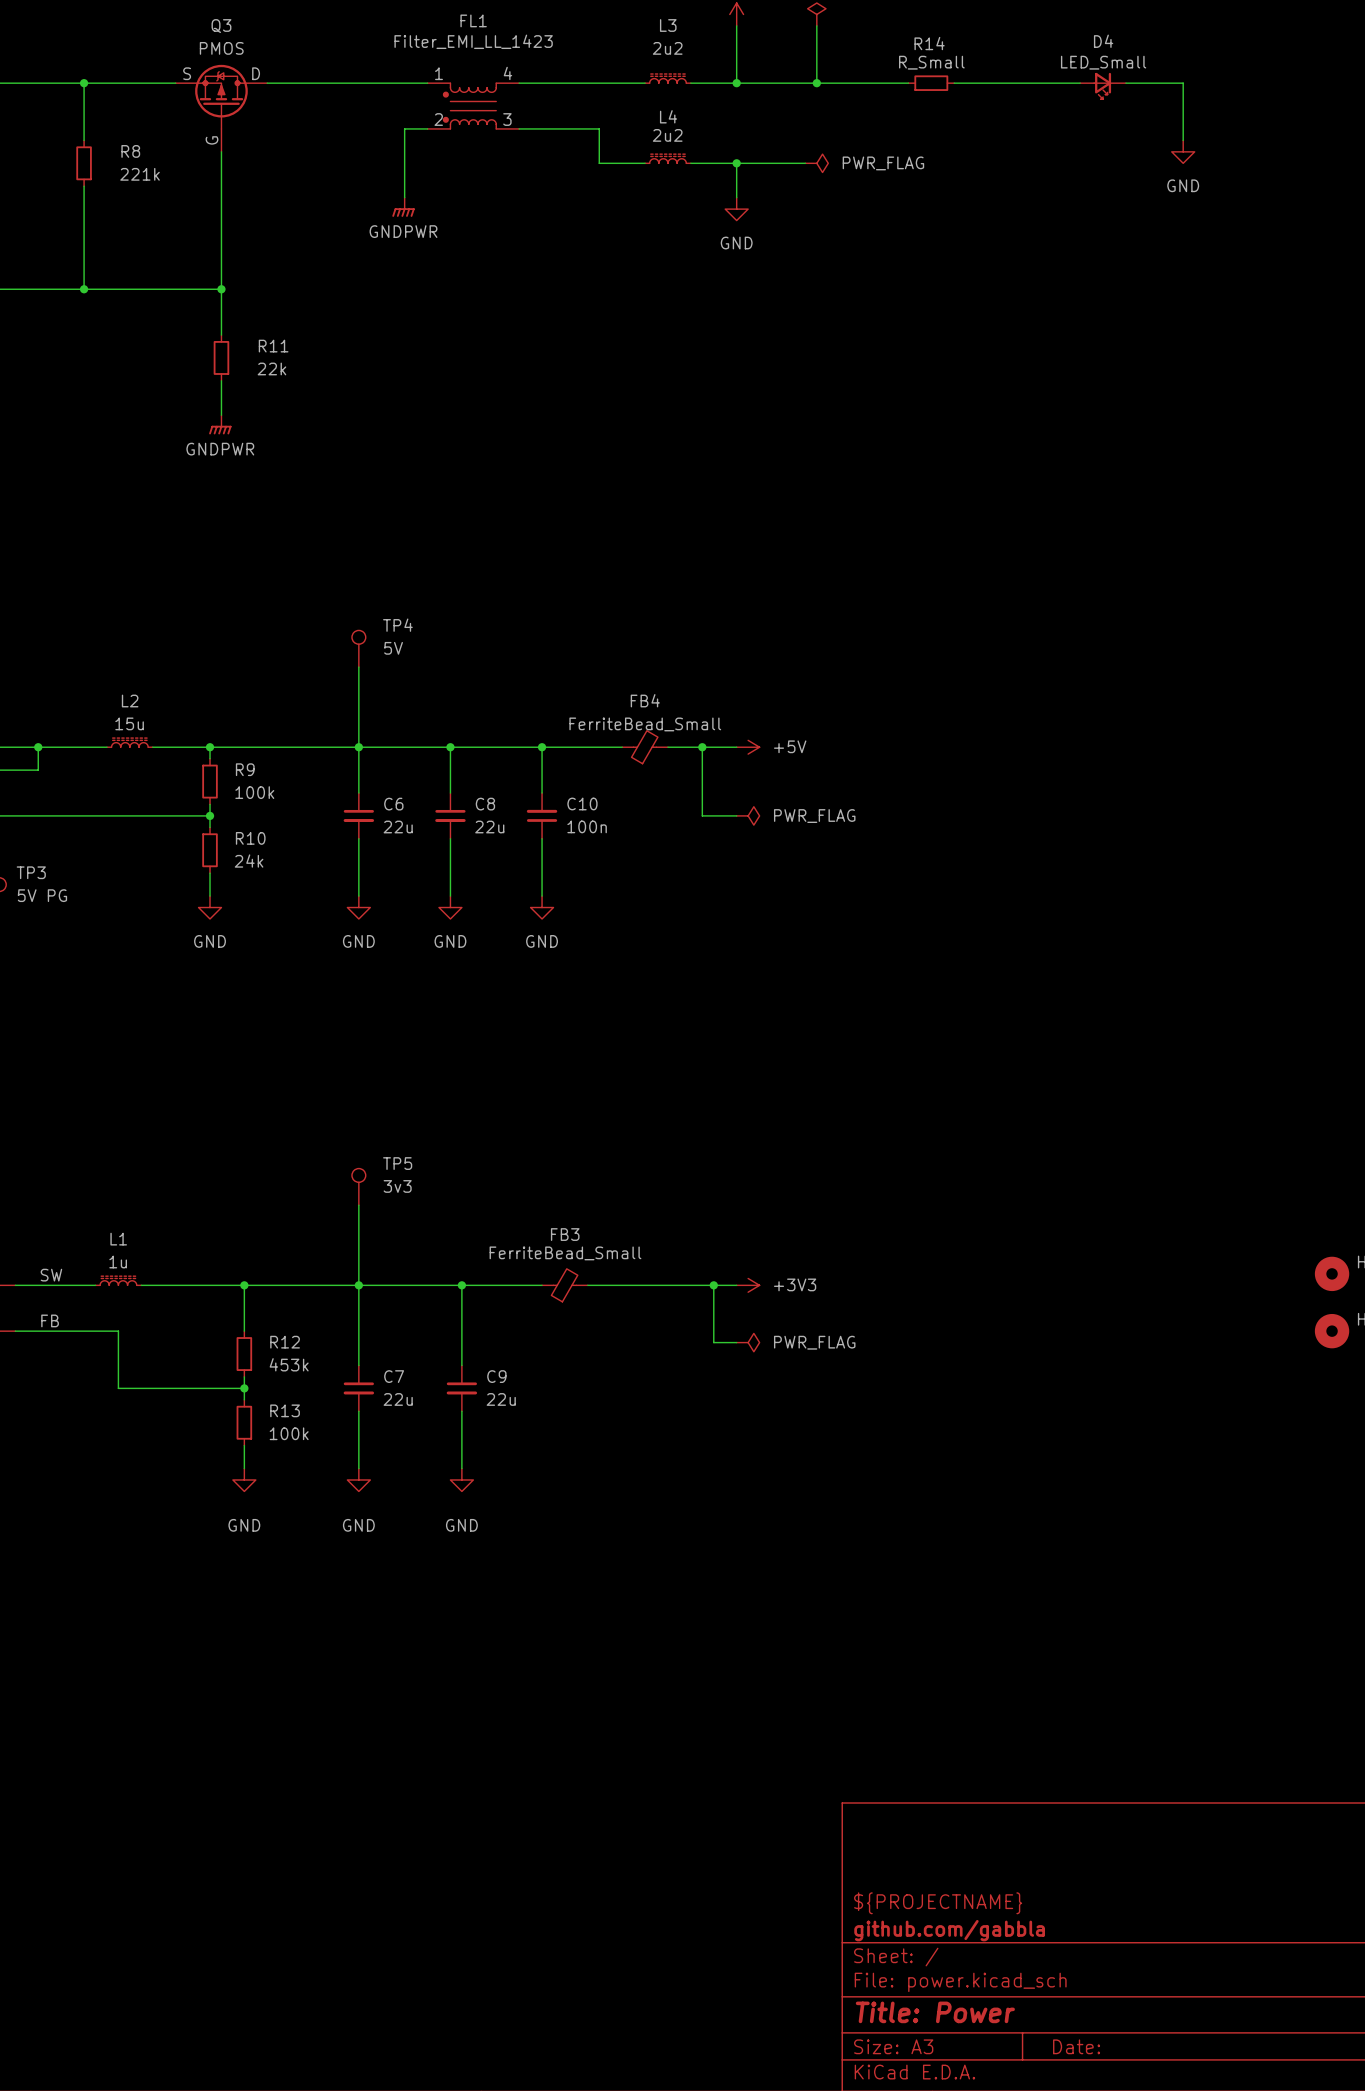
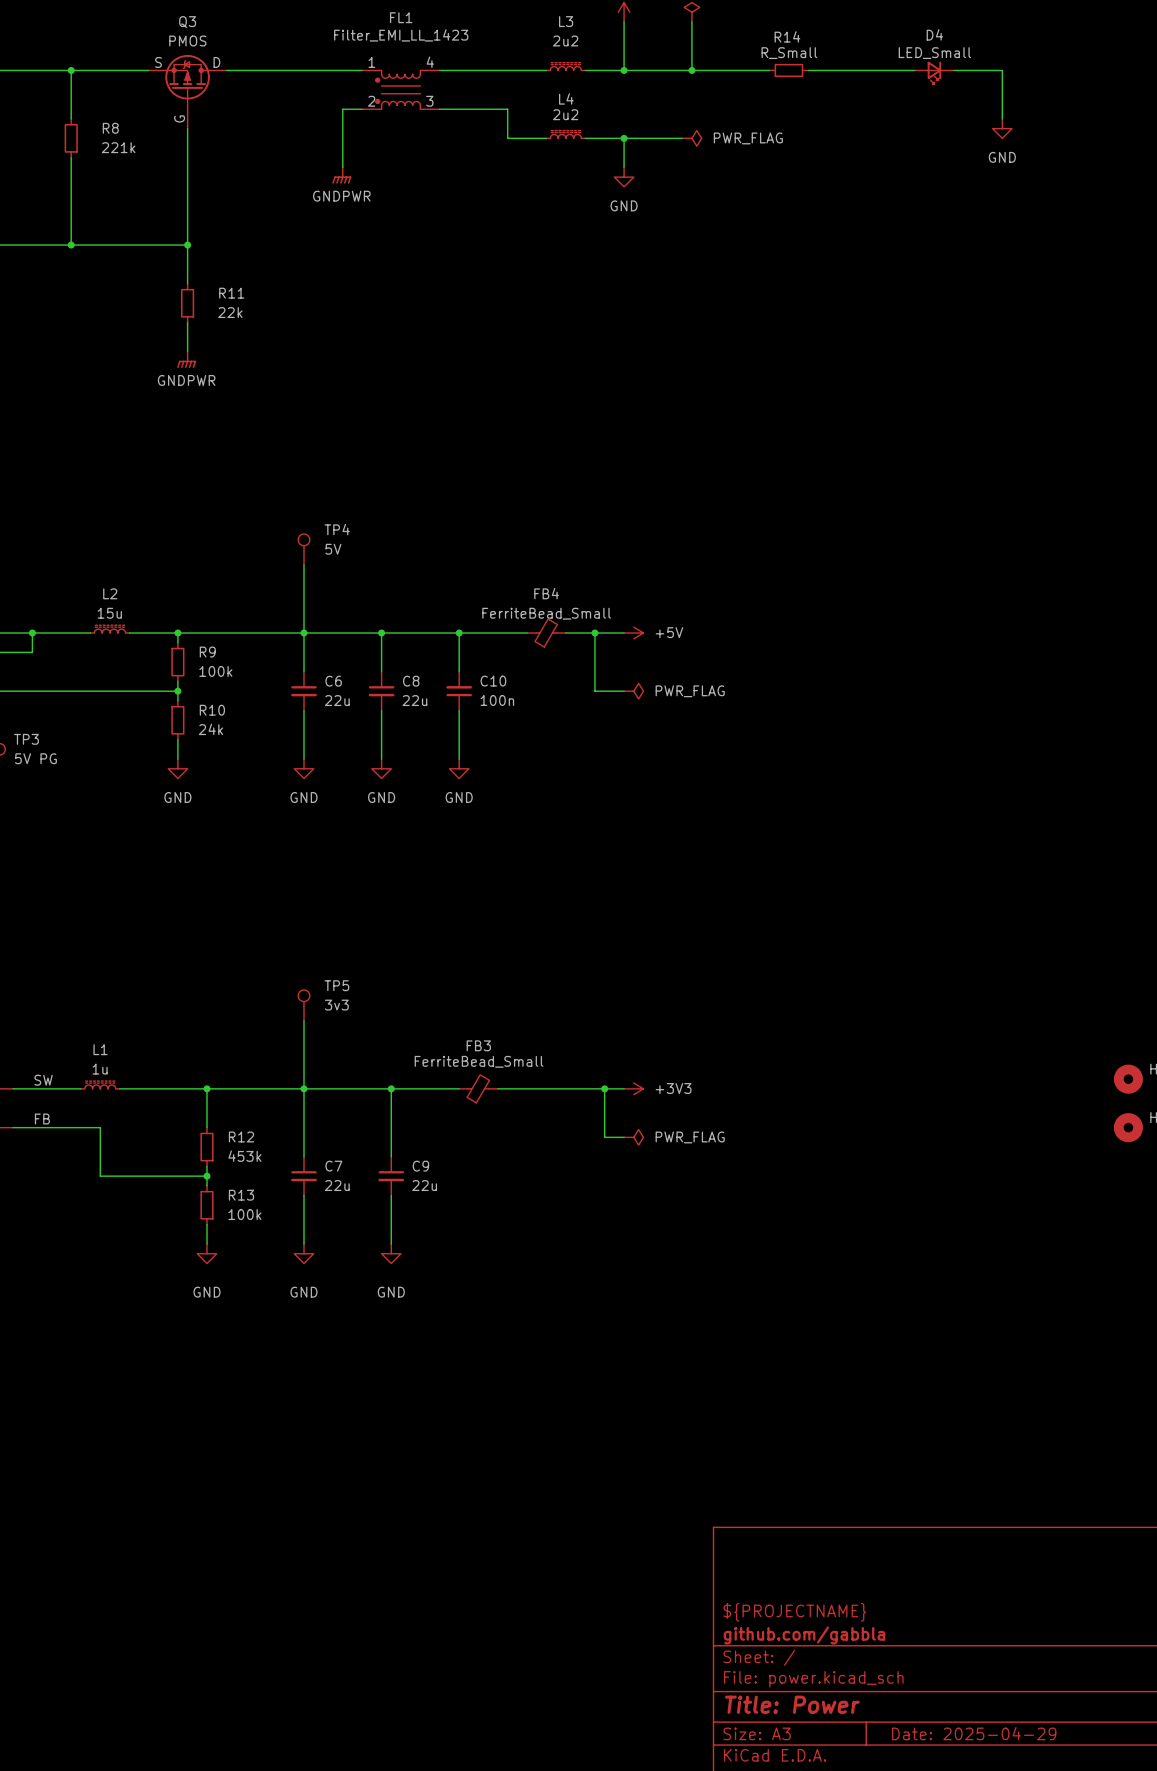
title block: Date: (1076, 2046) -> Date: 2025-04-29 (974, 1733)

